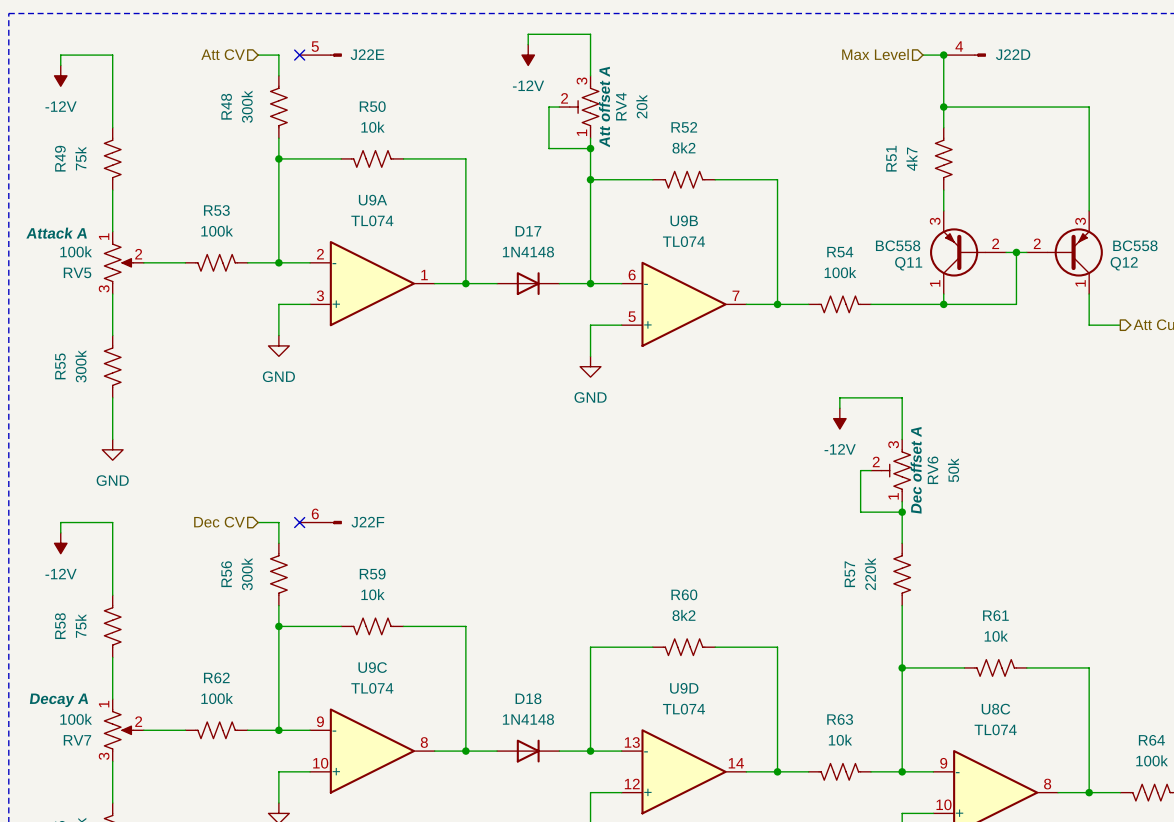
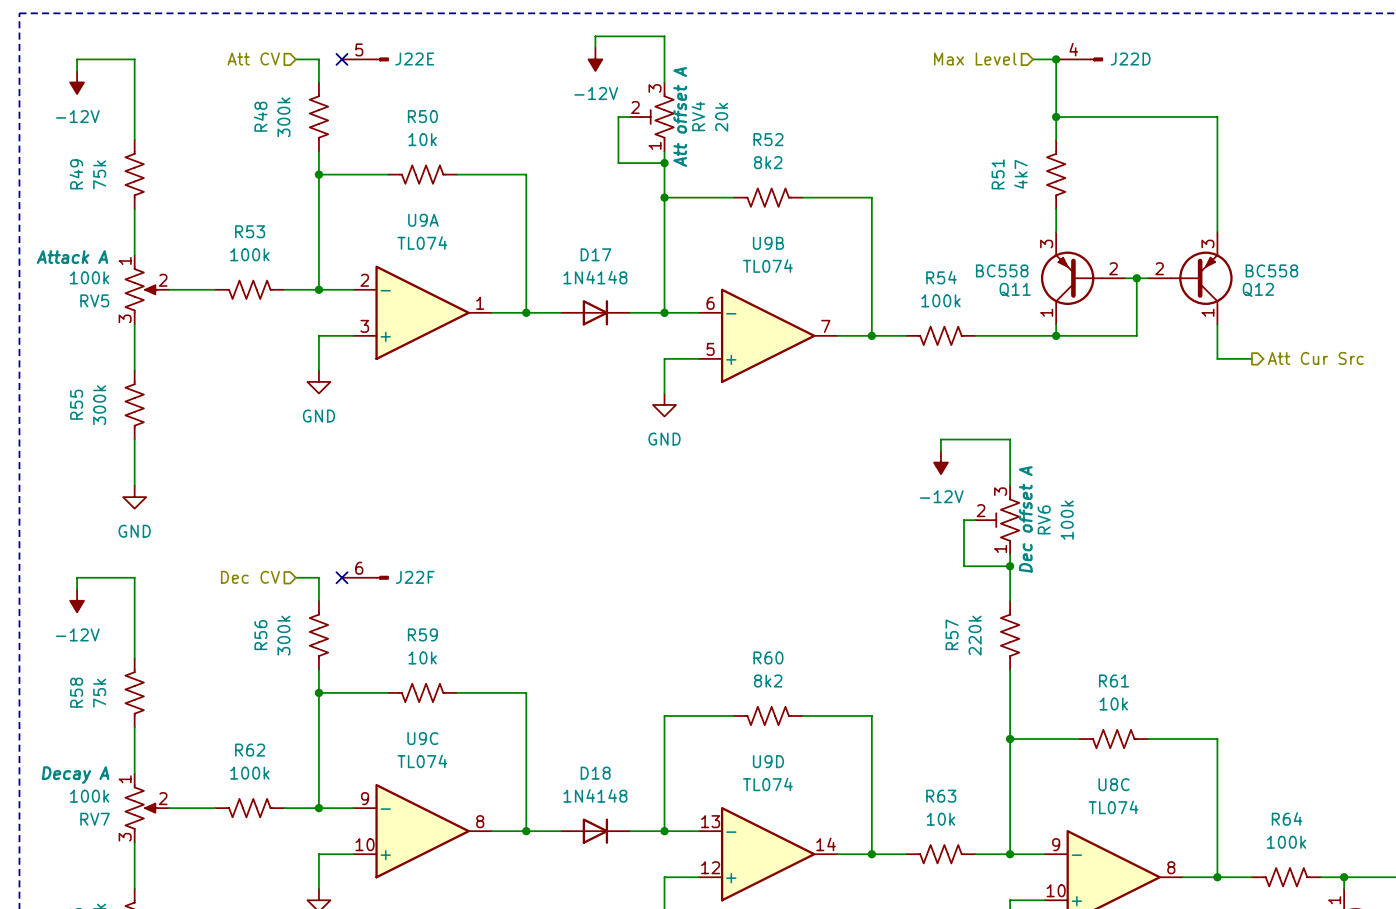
RV6 value: 50k (953, 470) -> 100k (1067, 520)

